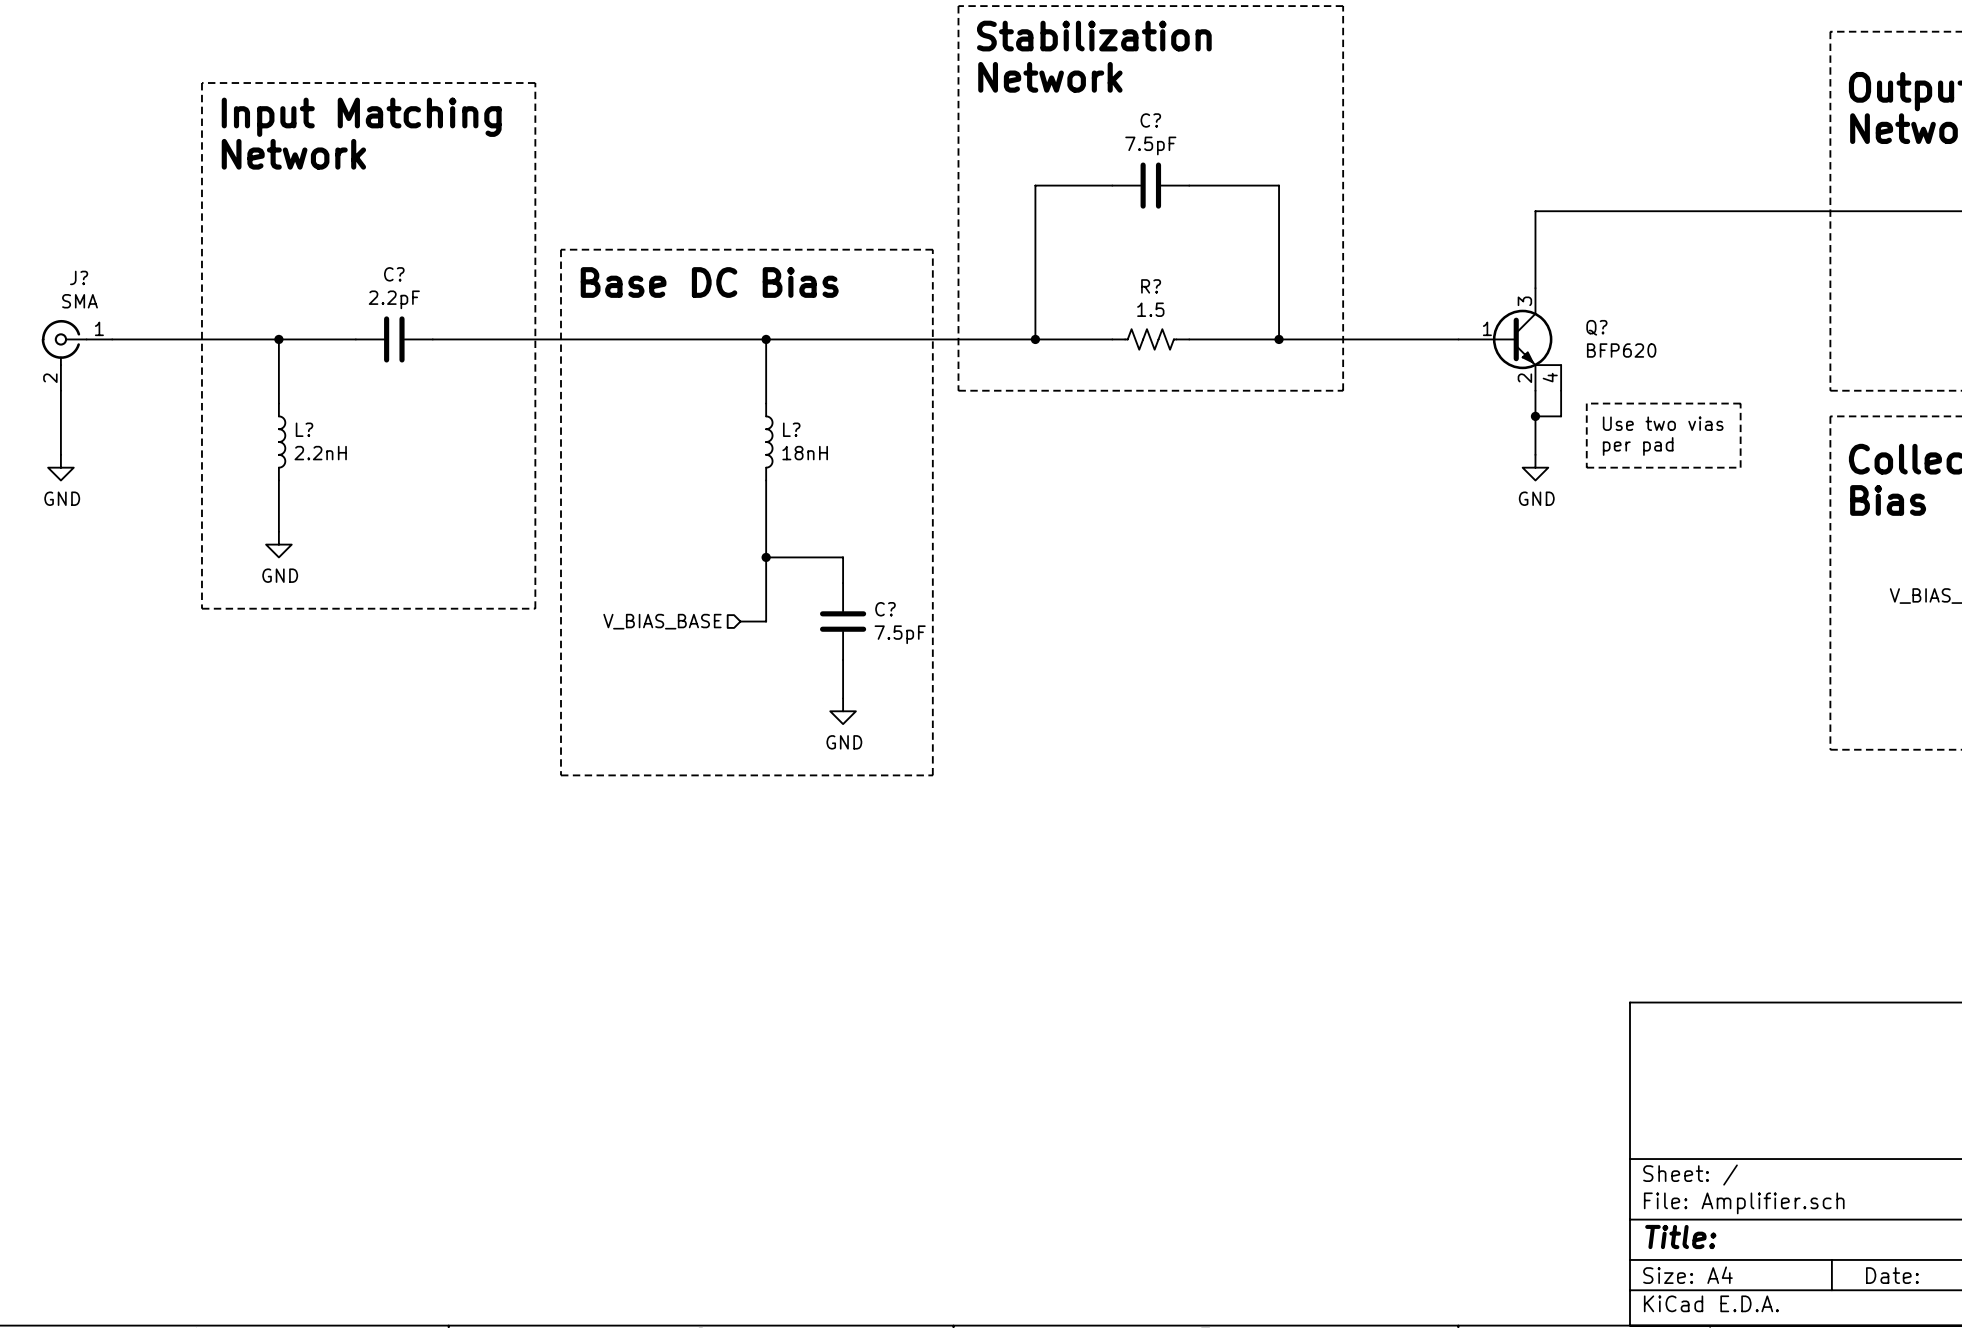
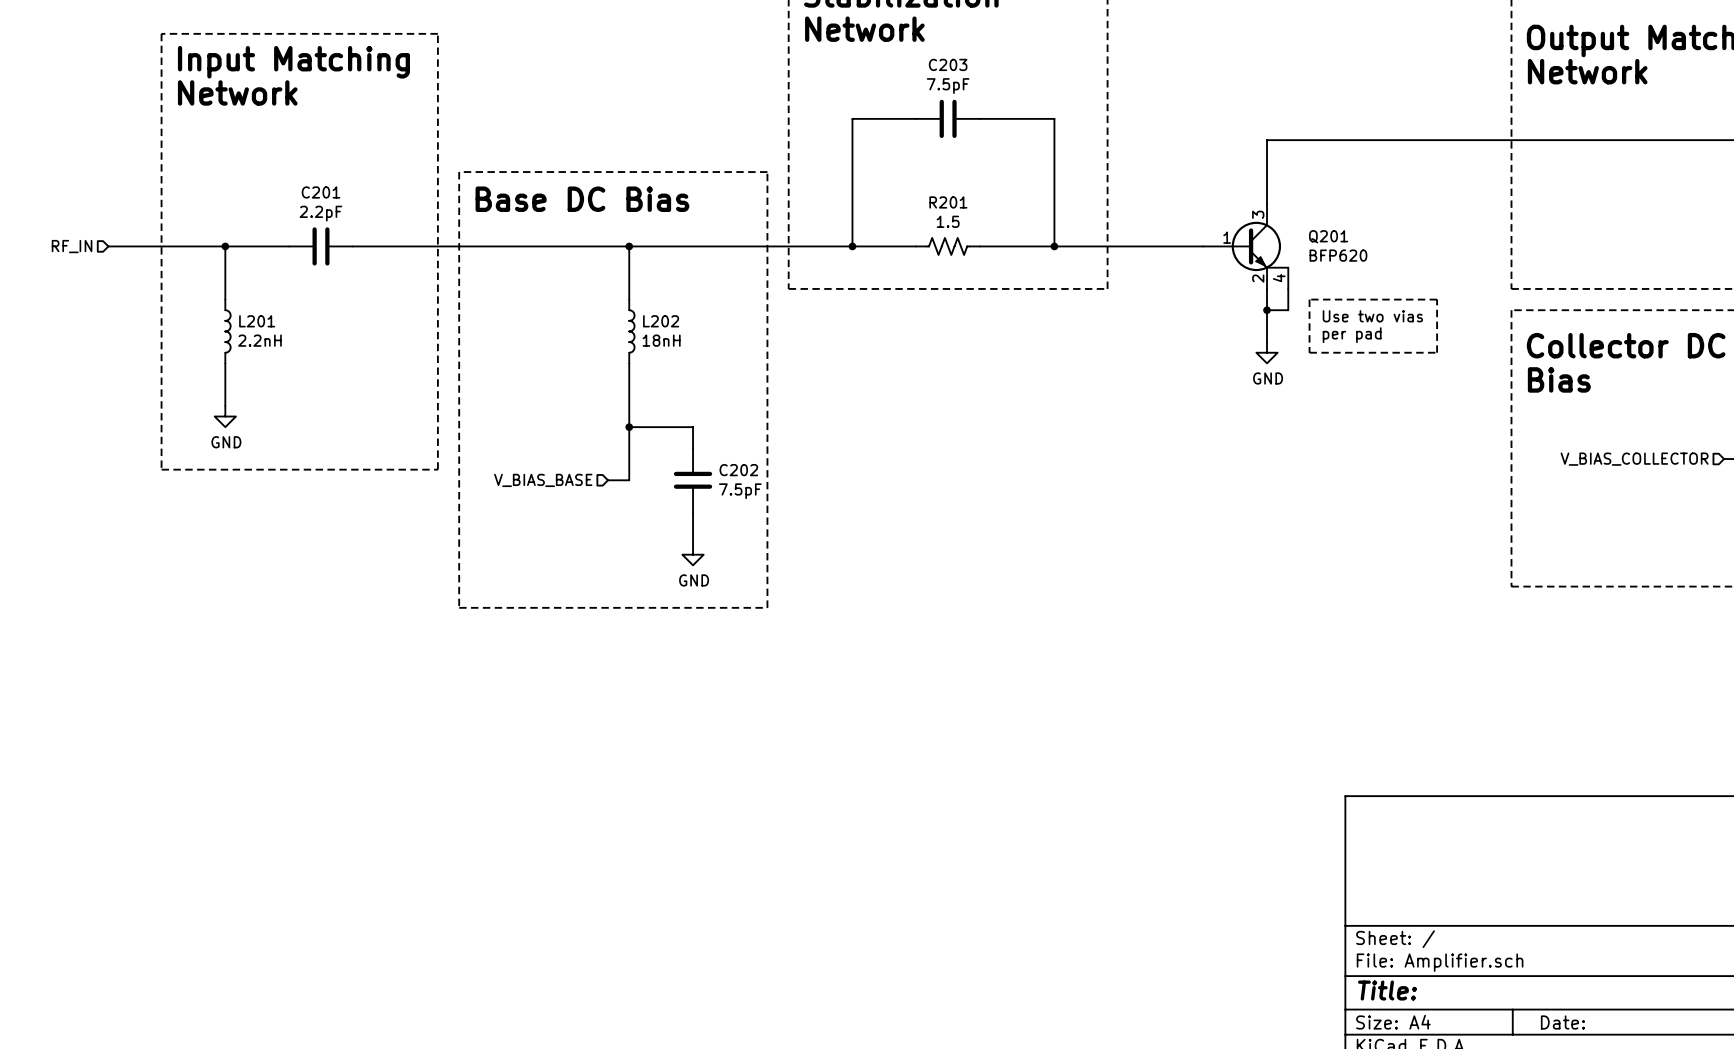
C? name: C? (1150, 120) -> C203 (948, 64)
C? name: C? (394, 274) -> C201 (320, 192)
R? name: R? (1151, 286) -> R201 (948, 202)
Q? name: Q? (1596, 327) -> Q201 (1328, 236)
hierarchical label: none -> RF_IN (72, 246)
wire: (112, 339) (137, 339) -> none
J?: SMA (76, 355) -> none
wire: (60, 390) (60, 454) -> none
L? name: L? (304, 429) -> L201 (257, 321)
L? name: L? (791, 429) -> L202 (661, 321)
power symbol: GND (60, 467) -> none
C? name: C? (885, 609) -> C202 (738, 470)

